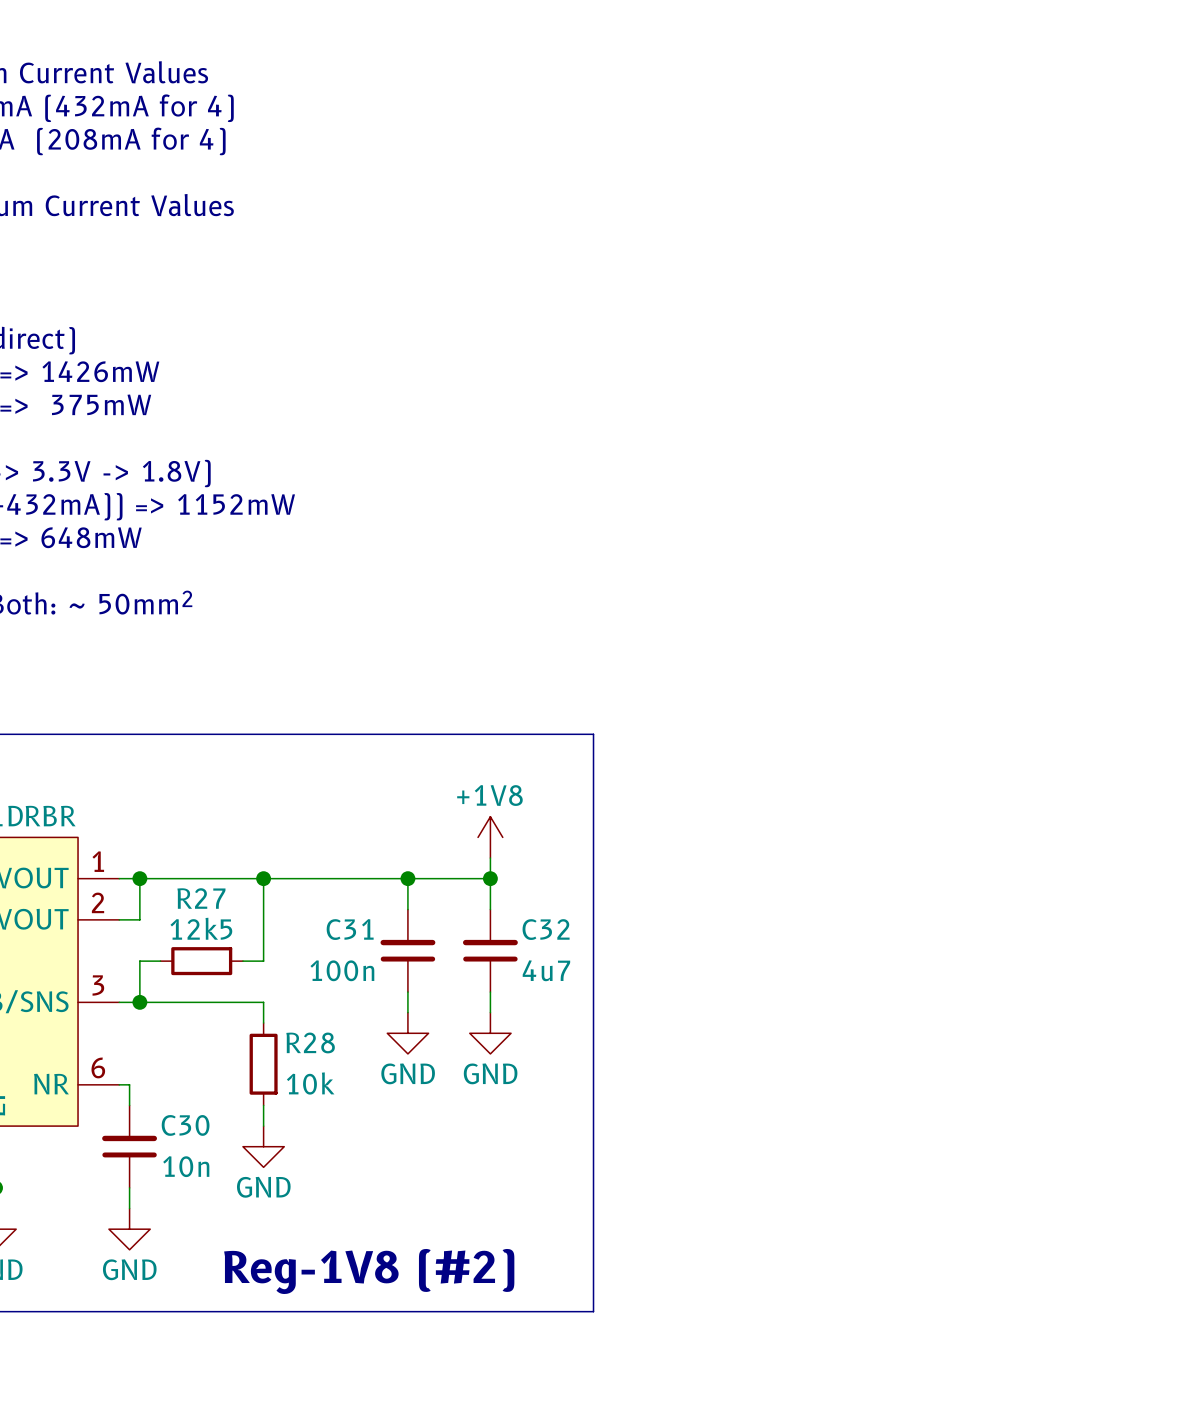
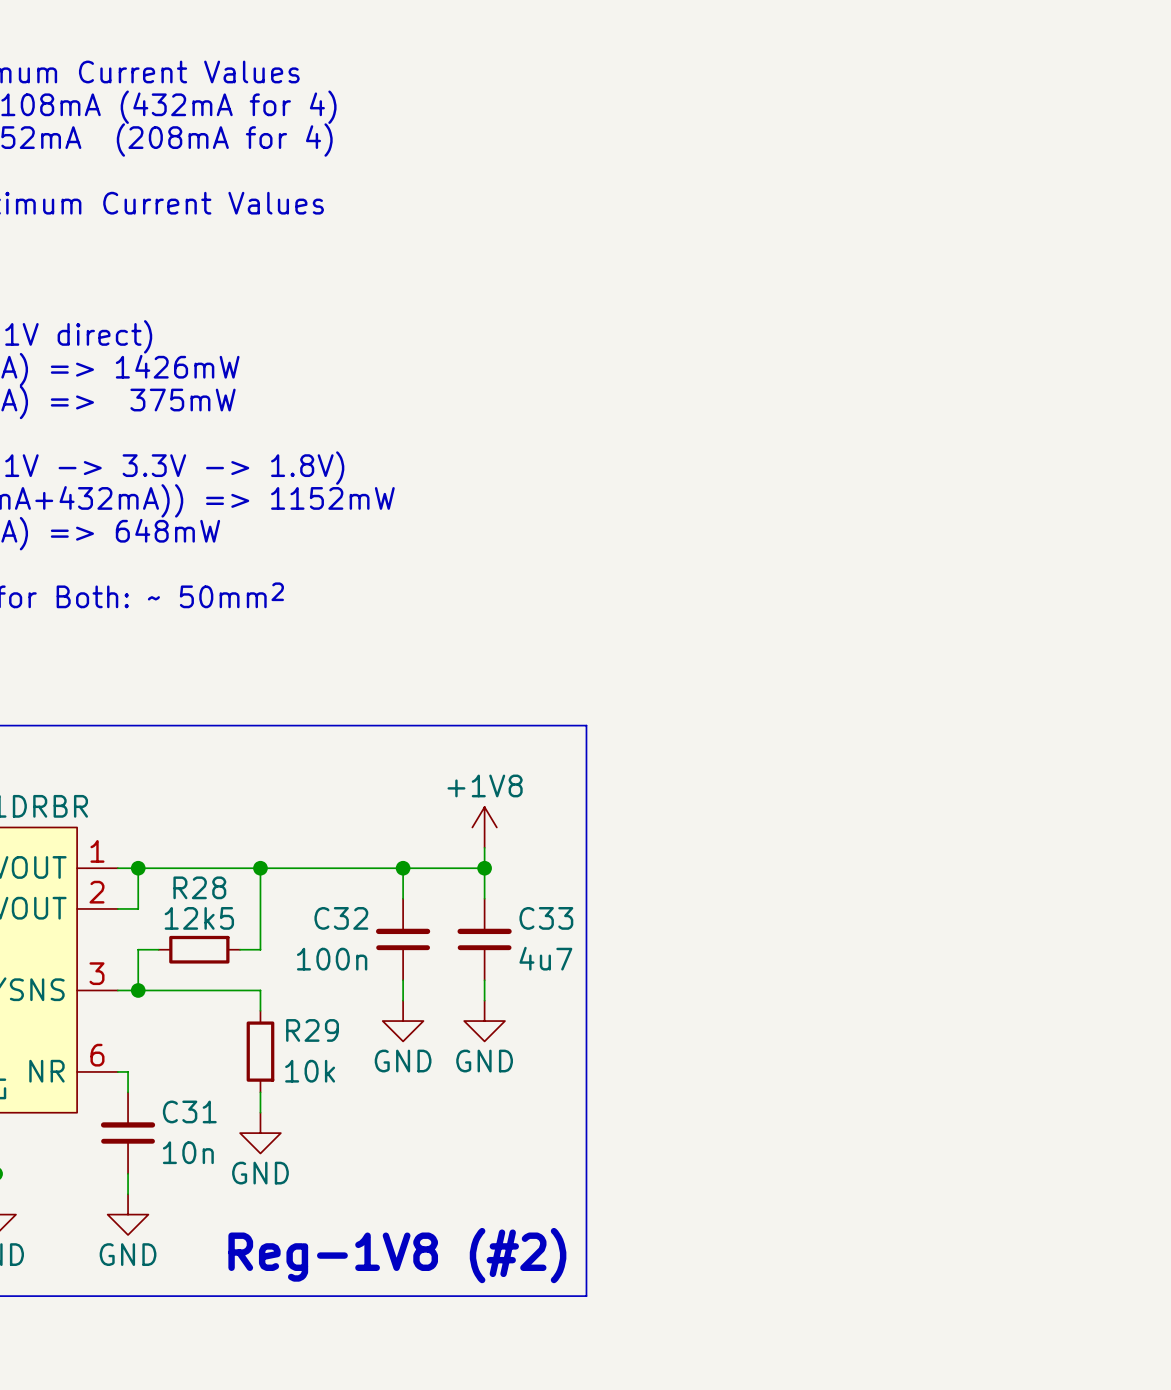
R27 name: R27 (201, 898) -> R28 (199, 887)
C31 name: C31 (350, 929) -> C32 (341, 918)
C32 name: C32 (546, 929) -> C33 (546, 918)
R28 name: R28 (310, 1042) -> R29 (312, 1030)
C30 name: C30 (185, 1125) -> C31 (189, 1111)

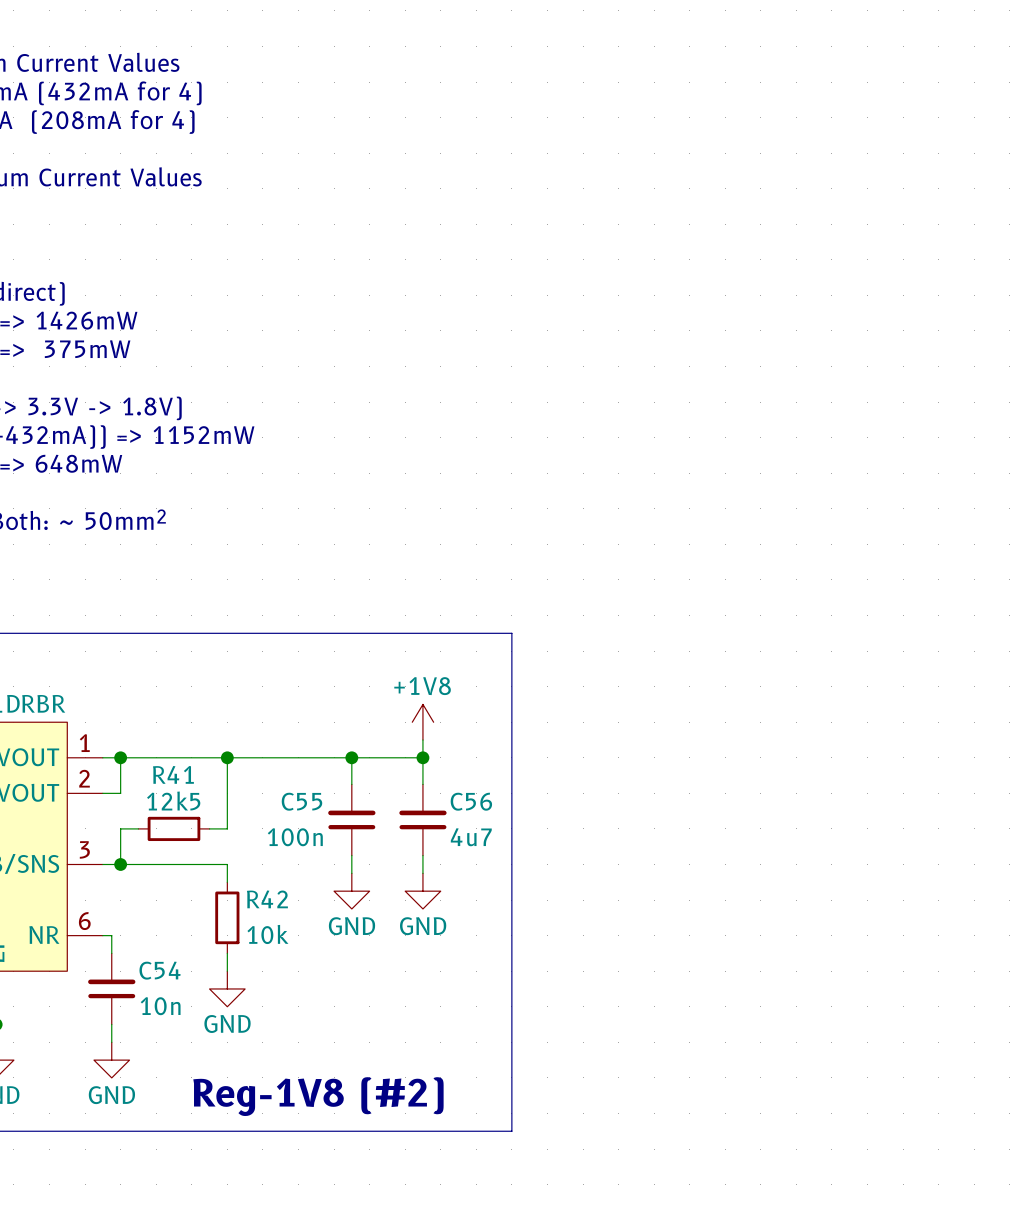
R28 name: R28 (199, 887) -> R41 (173, 774)
C32 name: C32 (341, 918) -> C55 (301, 801)
C33 name: C33 (546, 918) -> C56 (471, 801)
R29 name: R29 (312, 1030) -> R42 (267, 899)
C31 name: C31 (189, 1111) -> C54 (160, 970)

